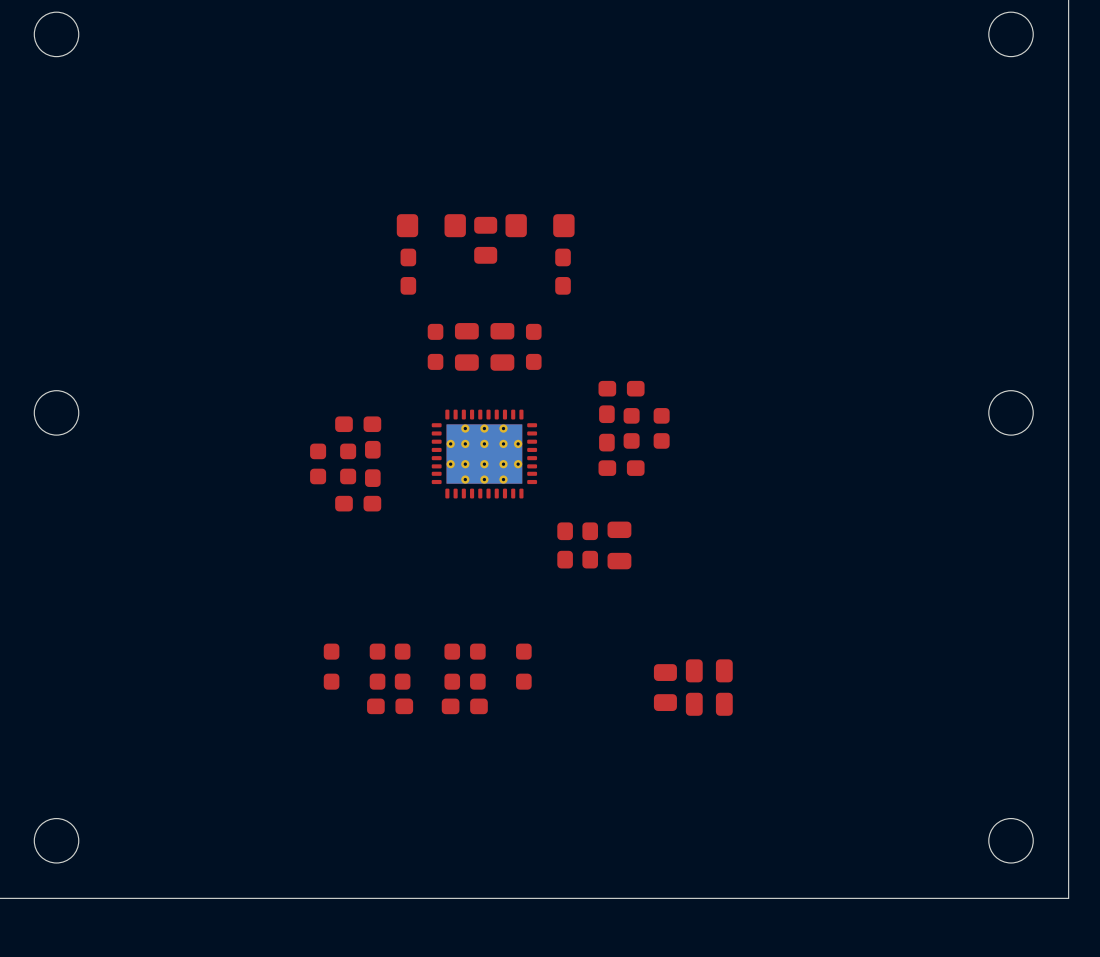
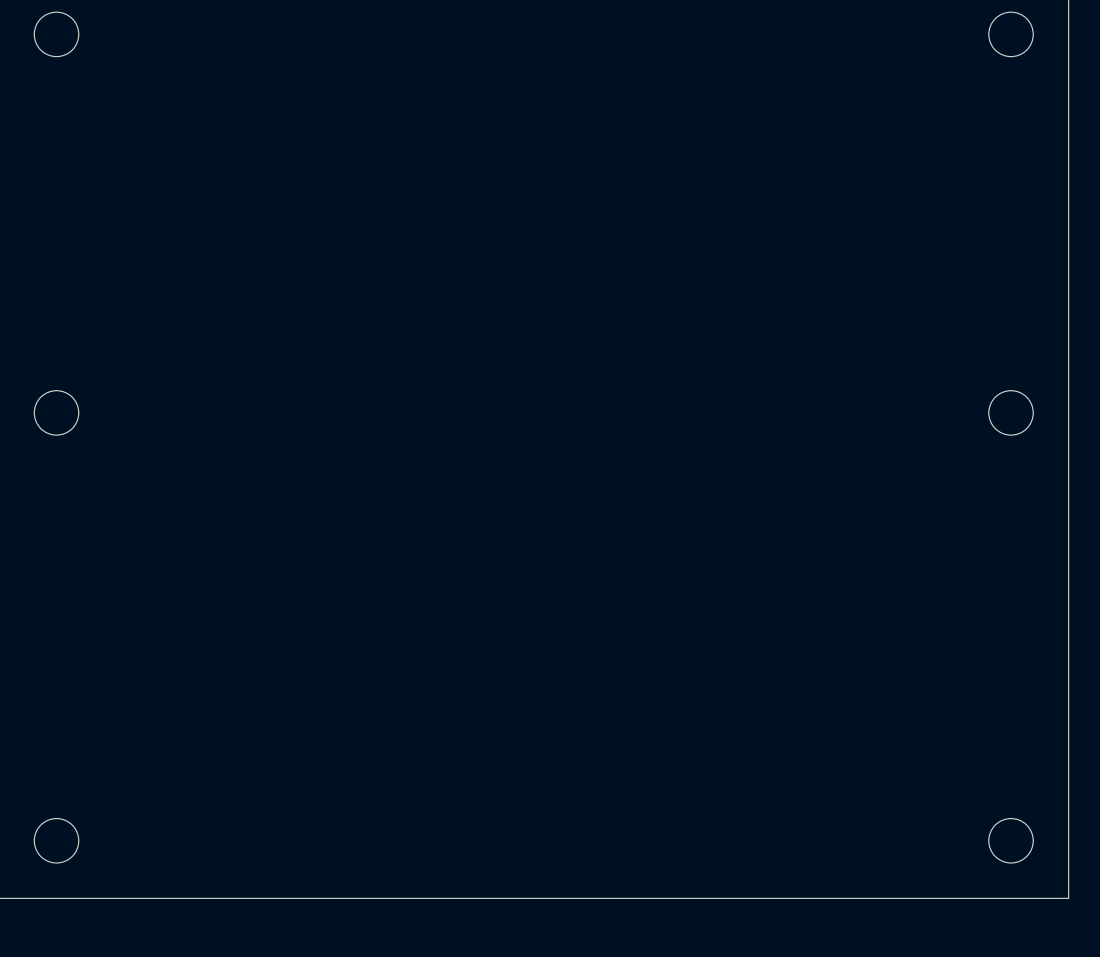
part: (431, 225) -> none
part: (540, 225) -> none
part: (485, 240) -> none
part: (408, 271) -> none
part: (563, 271) -> none
part: (435, 346) -> none
part: (466, 346) -> none
part: (502, 346) -> none
part: (533, 346) -> none
part: (621, 388) -> none
part: (646, 415) -> none
part: (358, 424) -> none
part: (606, 428) -> none
part: (646, 440) -> none
part: (333, 451) -> none
part: (484, 454) -> none
part: (372, 463) -> none
part: (621, 468) -> none
part: (333, 476) -> none
part: (358, 503) -> none
part: (565, 545) -> none
part: (590, 545) -> none
part: (619, 545) -> none
part: (331, 666) -> none
part: (377, 666) -> none
part: (402, 666) -> none
part: (452, 666) -> none
part: (477, 666) -> none
part: (523, 666) -> none
part: (709, 670) -> none
part: (665, 687) -> none
part: (709, 704) -> none
part: (390, 706) -> none
part: (464, 706) -> none

